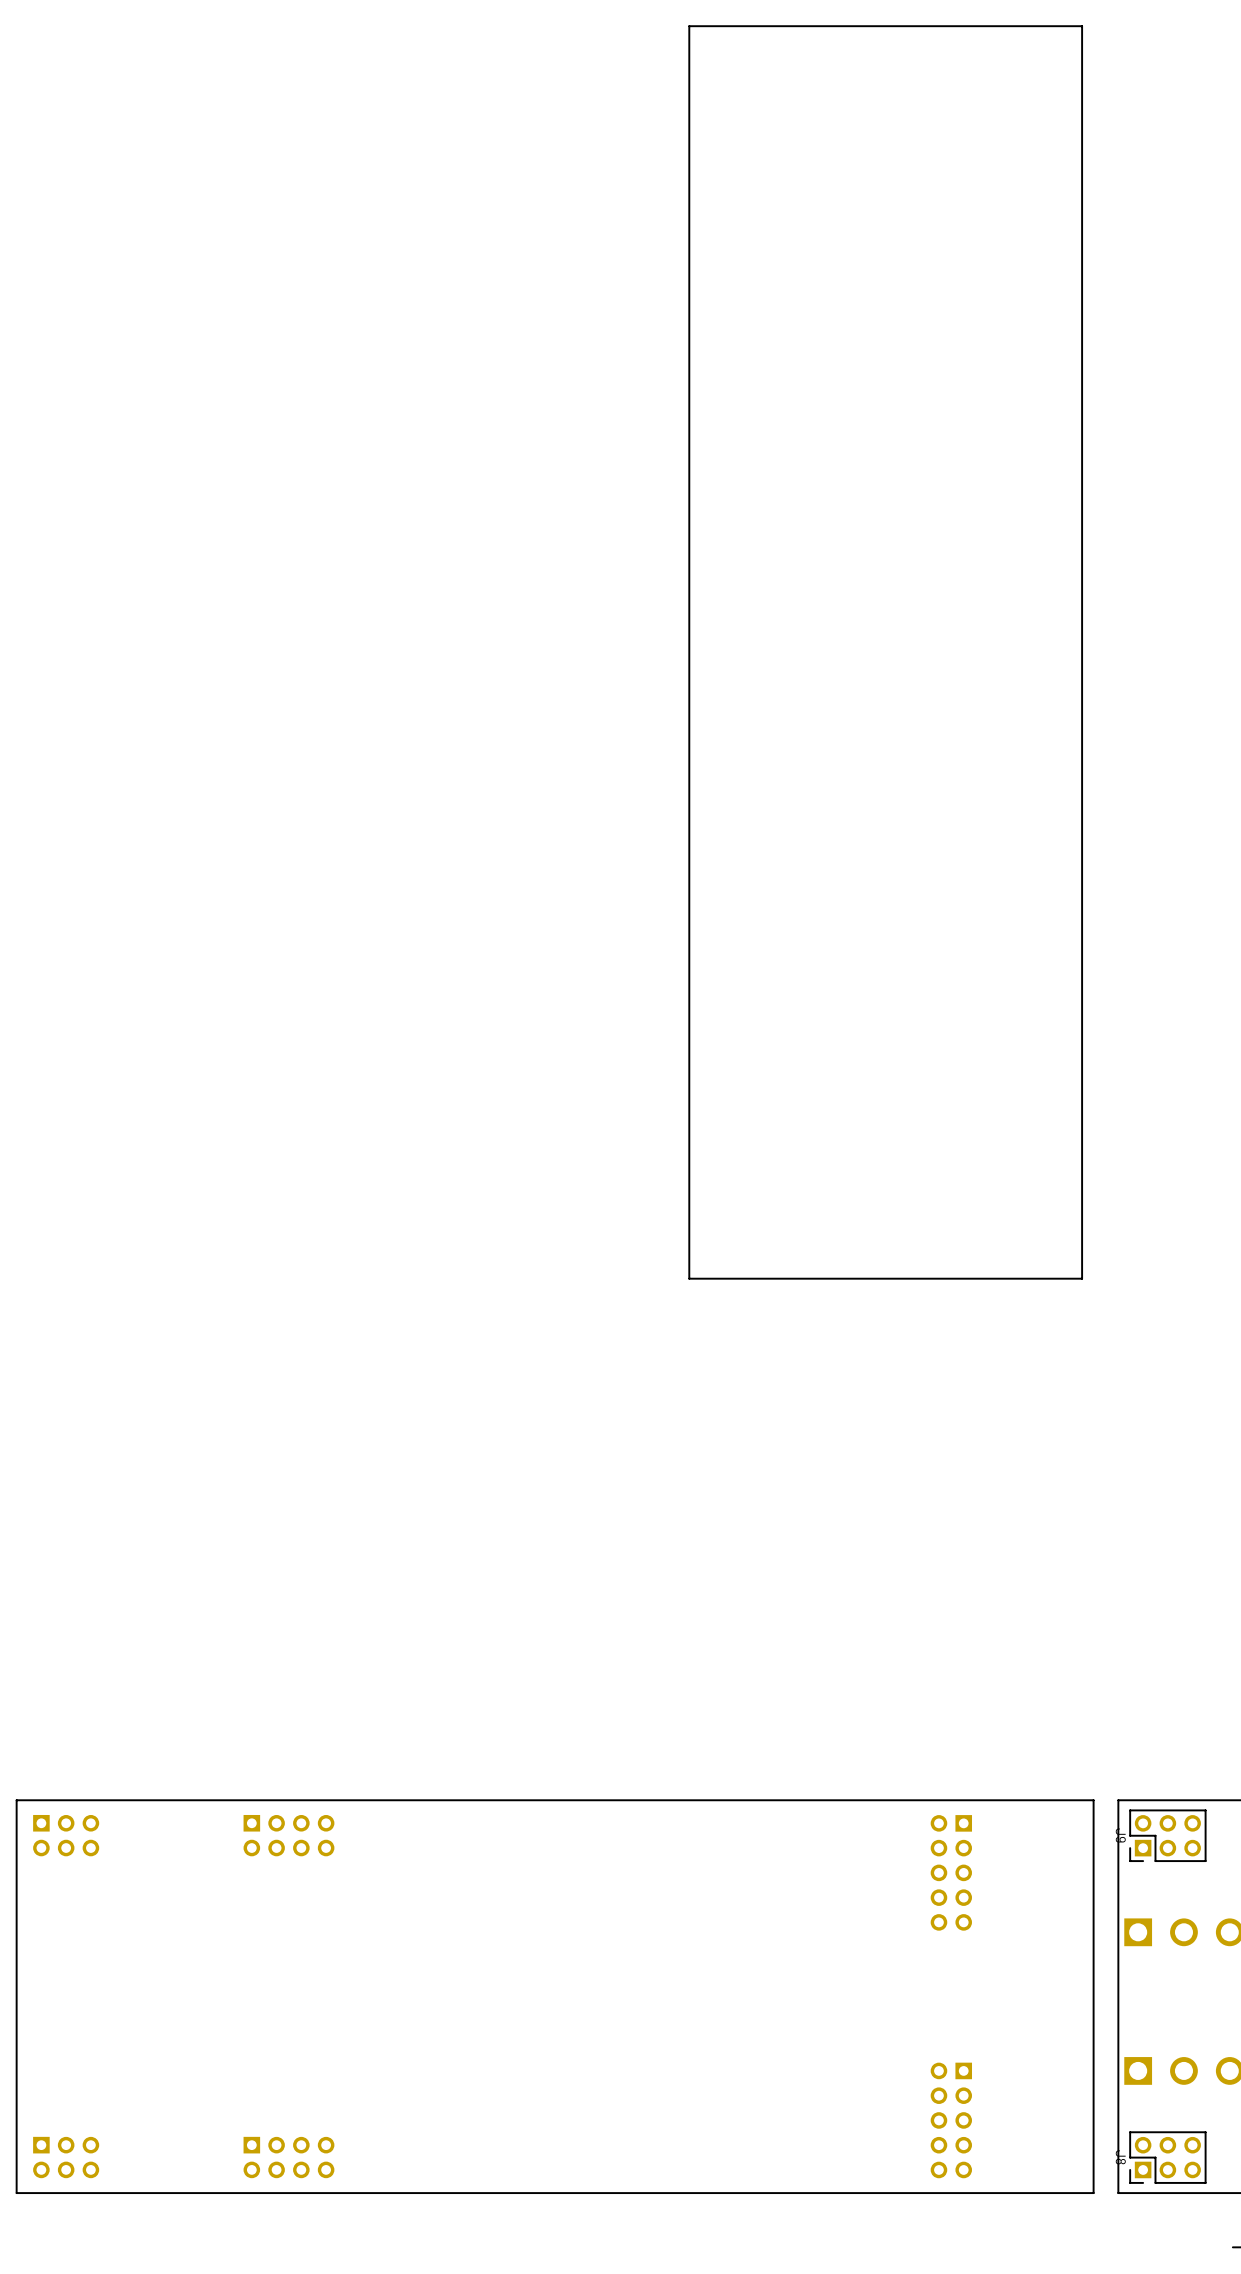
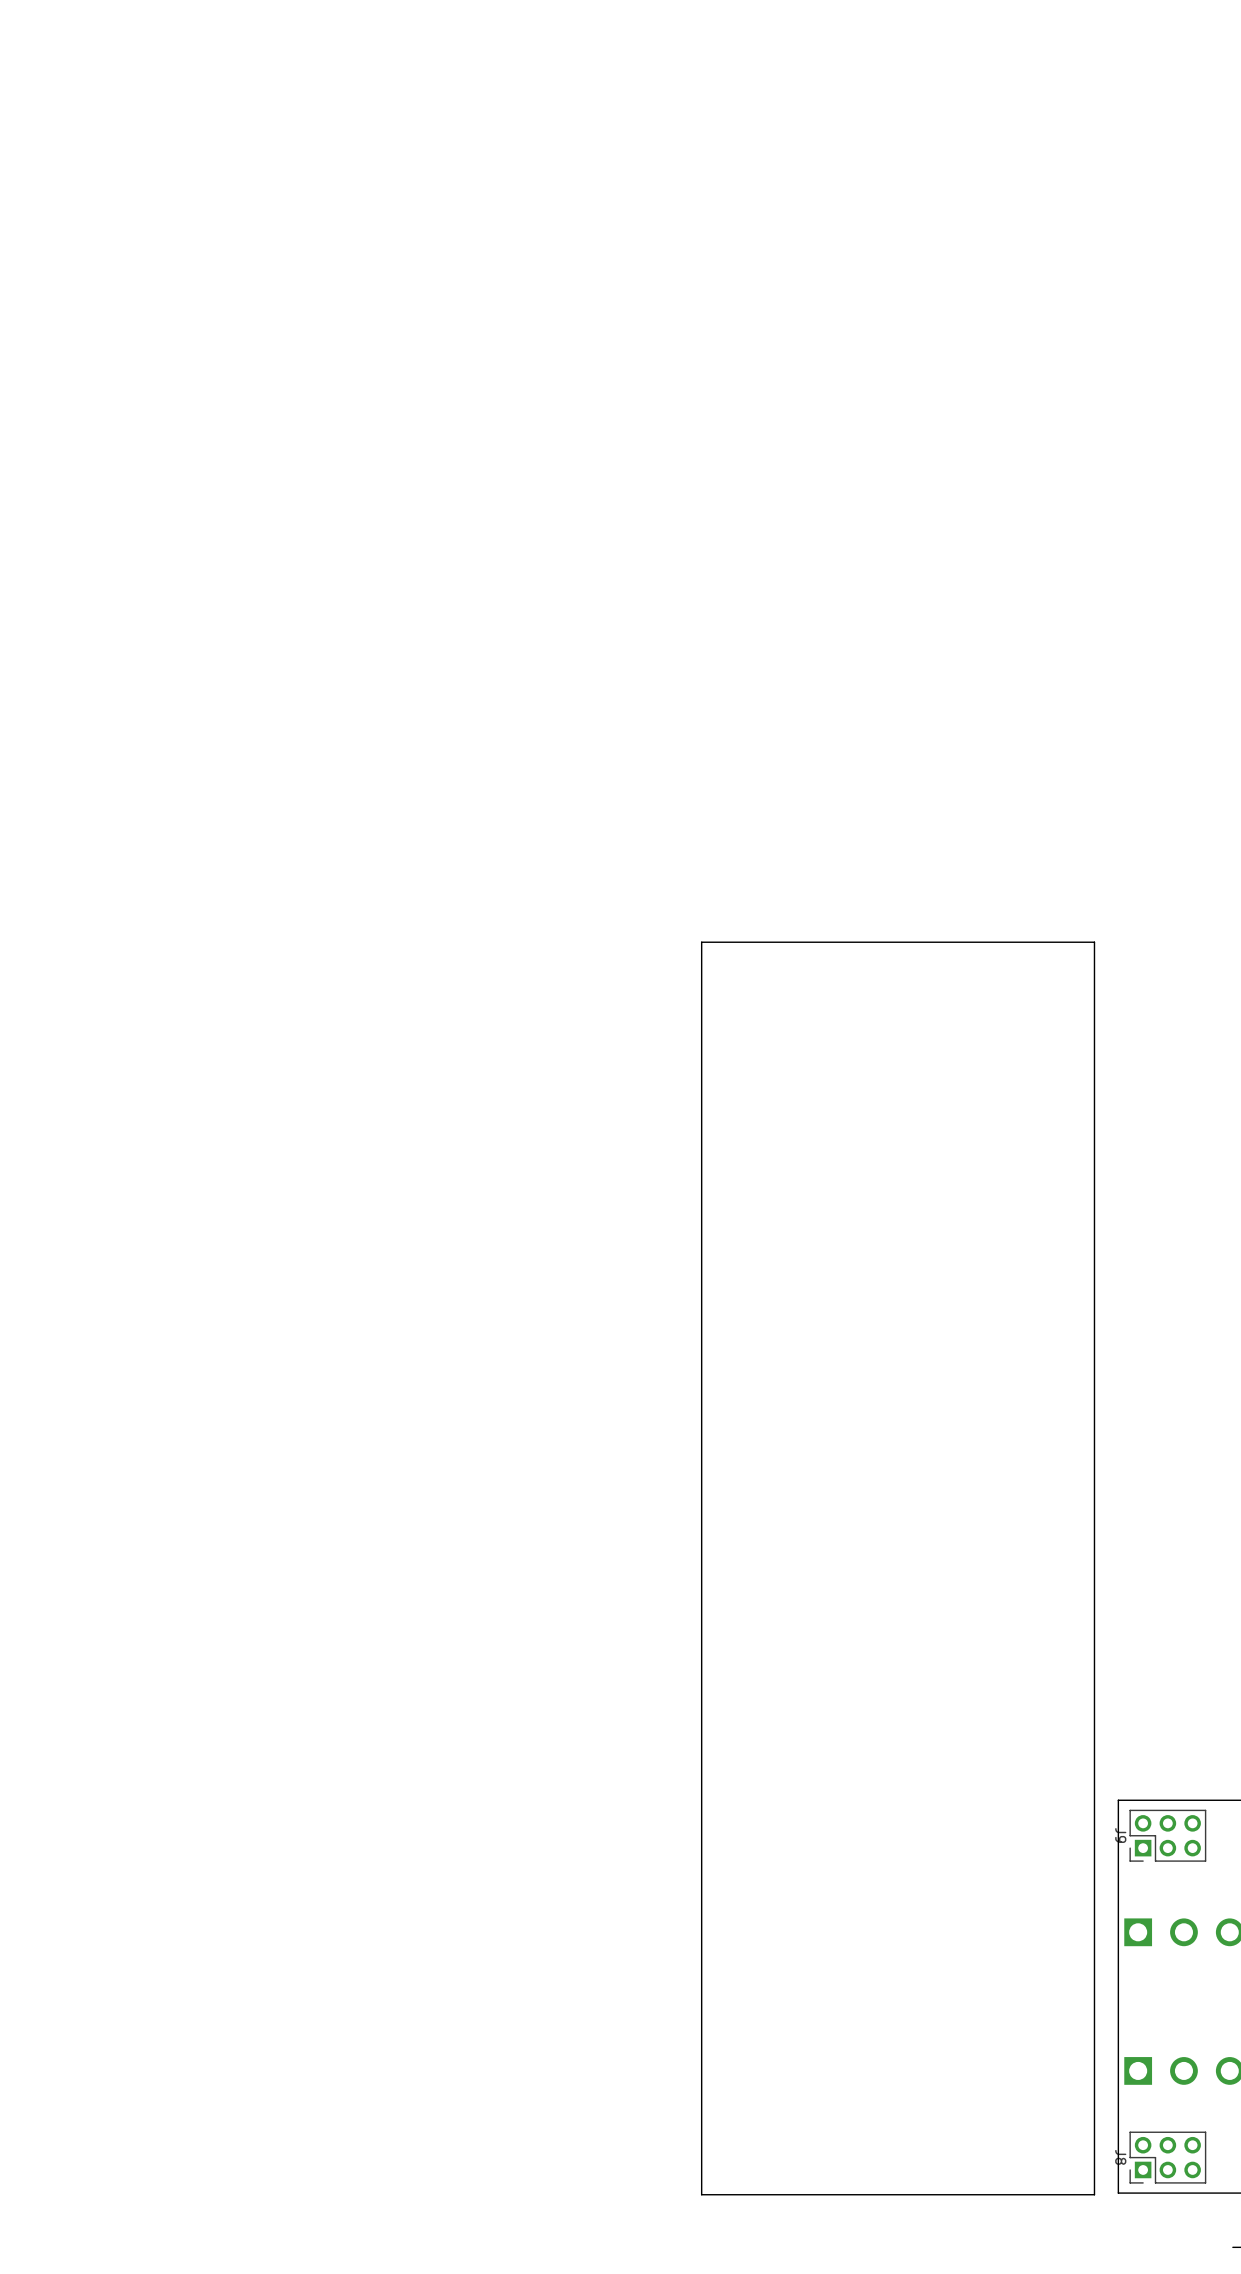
board edge: (1082, 26) (1082, 1278) (689, 1278) (689, 26) (1082, 26) -> none
board edge: none -> (1094, 942) (1094, 2194) (701, 2194) (701, 942) (1094, 942)
board edge: (1093, 1800) (1093, 2193) (16, 2193) (16, 1800) (1093, 1800) -> none
part: (66, 1835) -> none
part: (288, 1835) -> none
part: (951, 1872) -> none
part: (951, 2120) -> none
part: (66, 2157) -> none
part: (288, 2157) -> none

